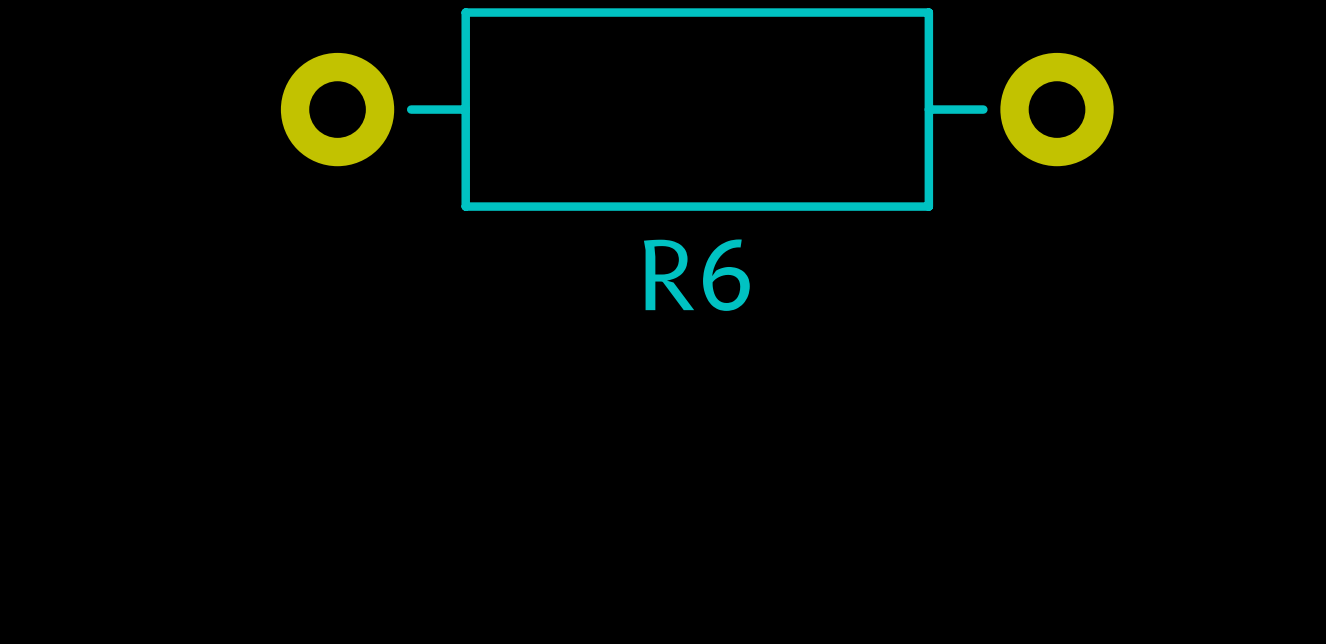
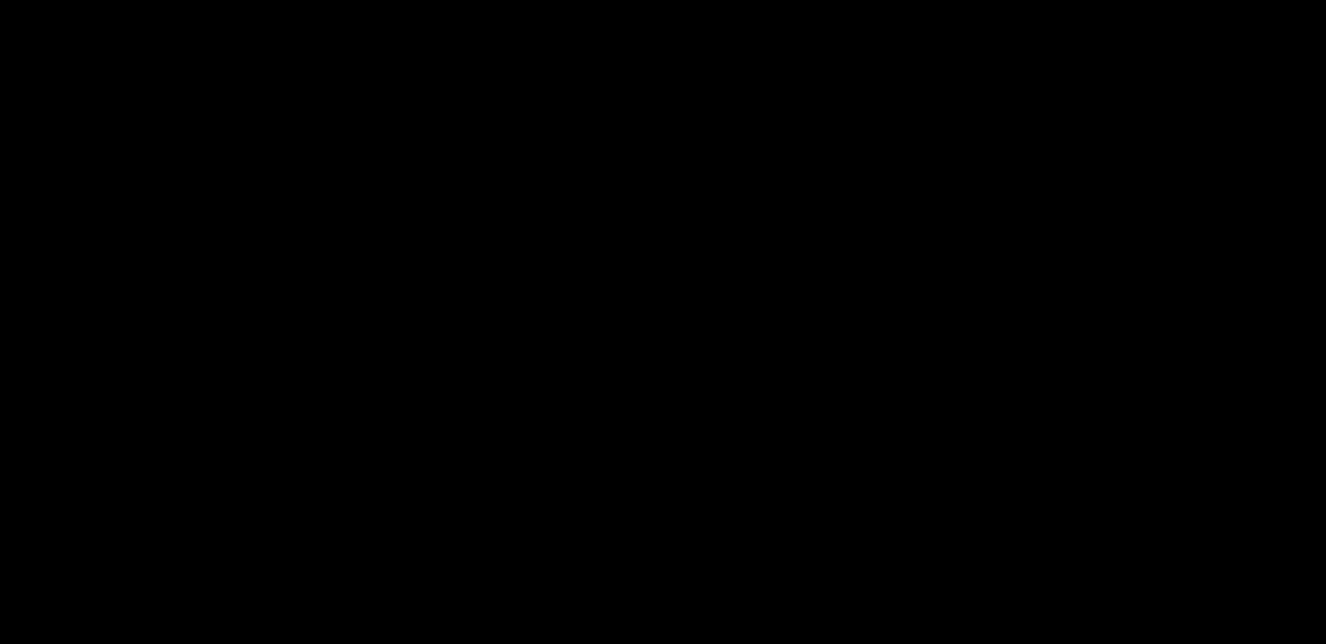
R6: (697, 109) -> none

